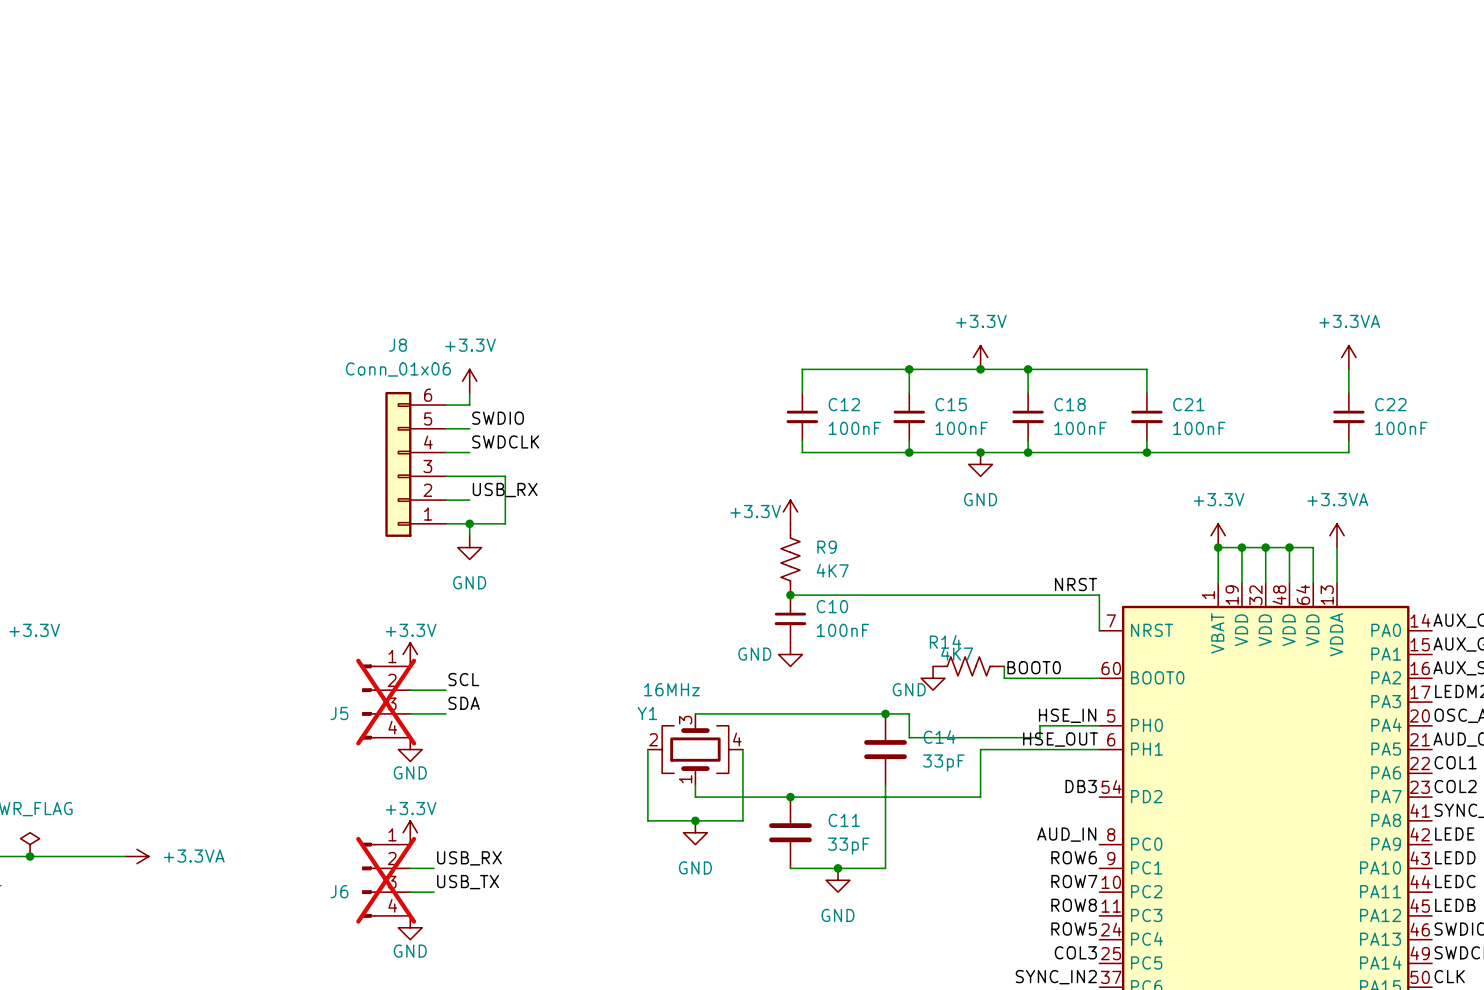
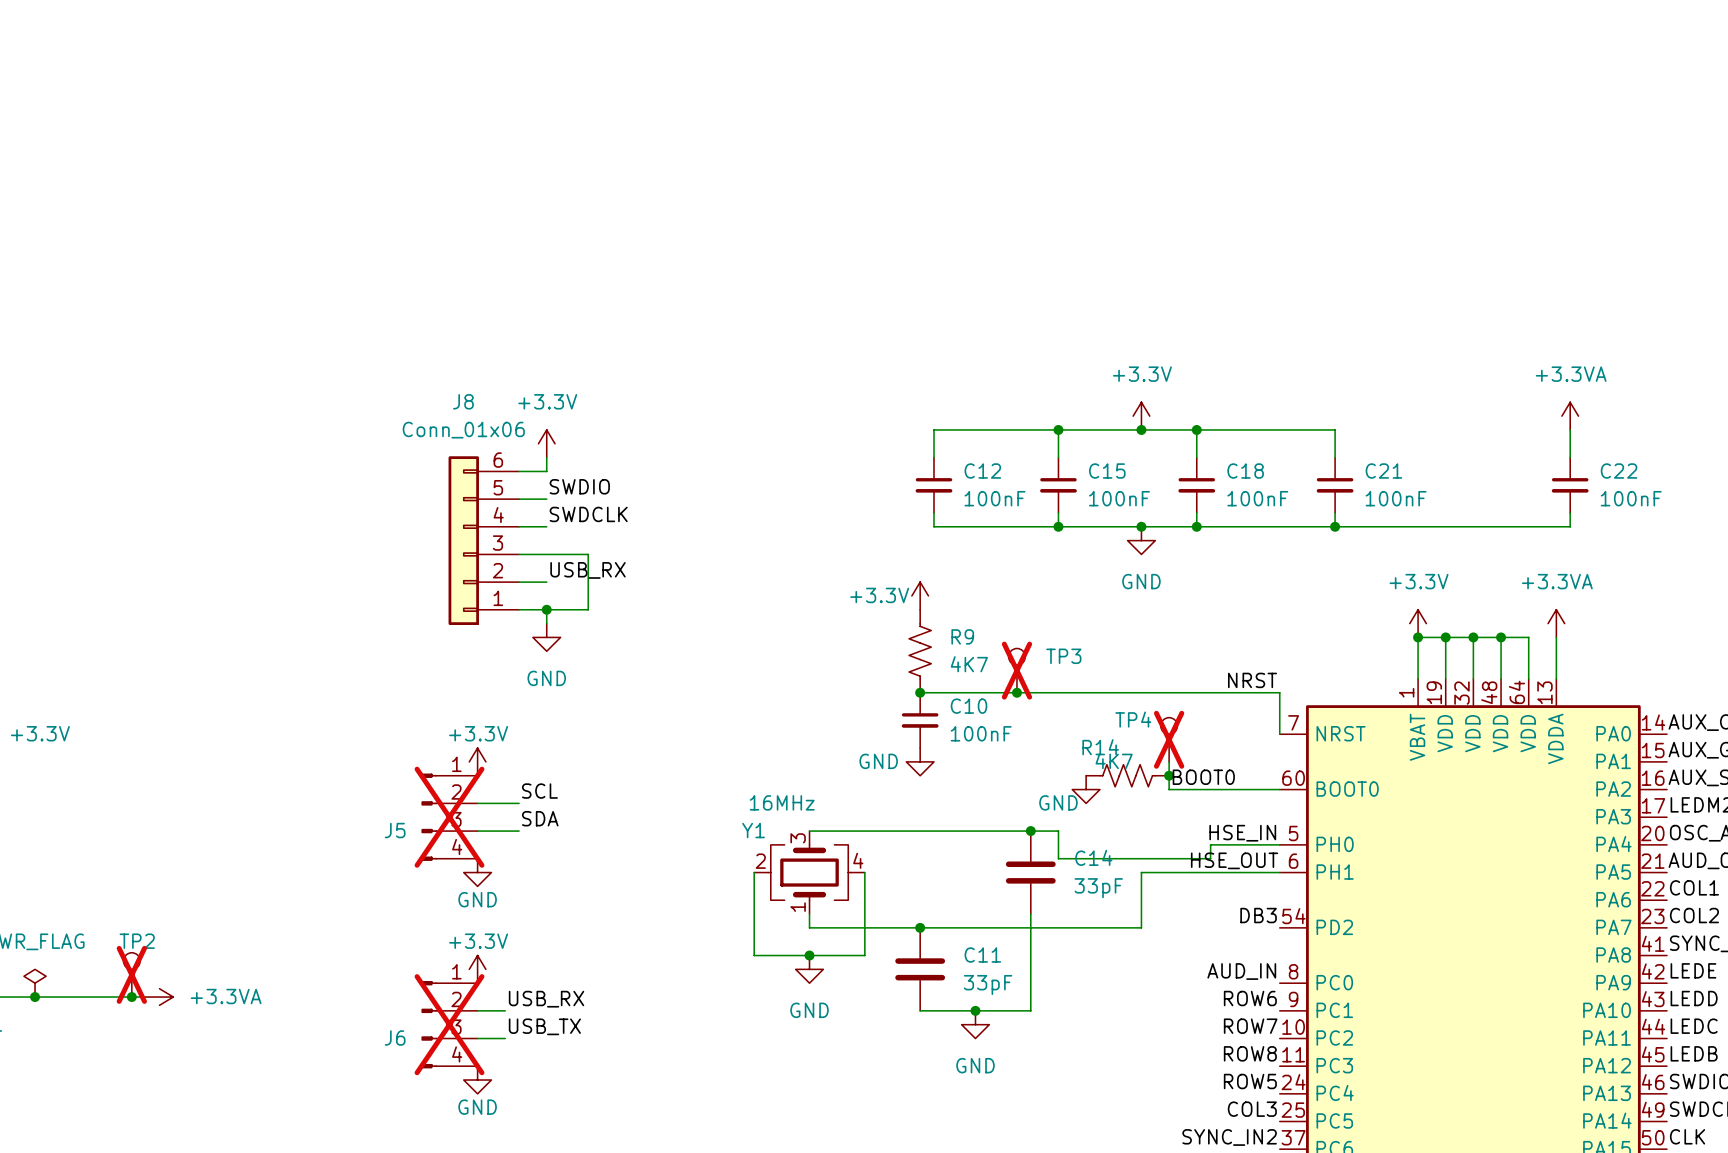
TP3: none -> (1016, 670)
junction: none -> (1016, 692)
TP4: none -> (1169, 739)
wire: none -> (1169, 761) (1169, 775)
junction: none -> (1169, 775)
TP2: none -> (131, 974)
junction: none -> (131, 997)

